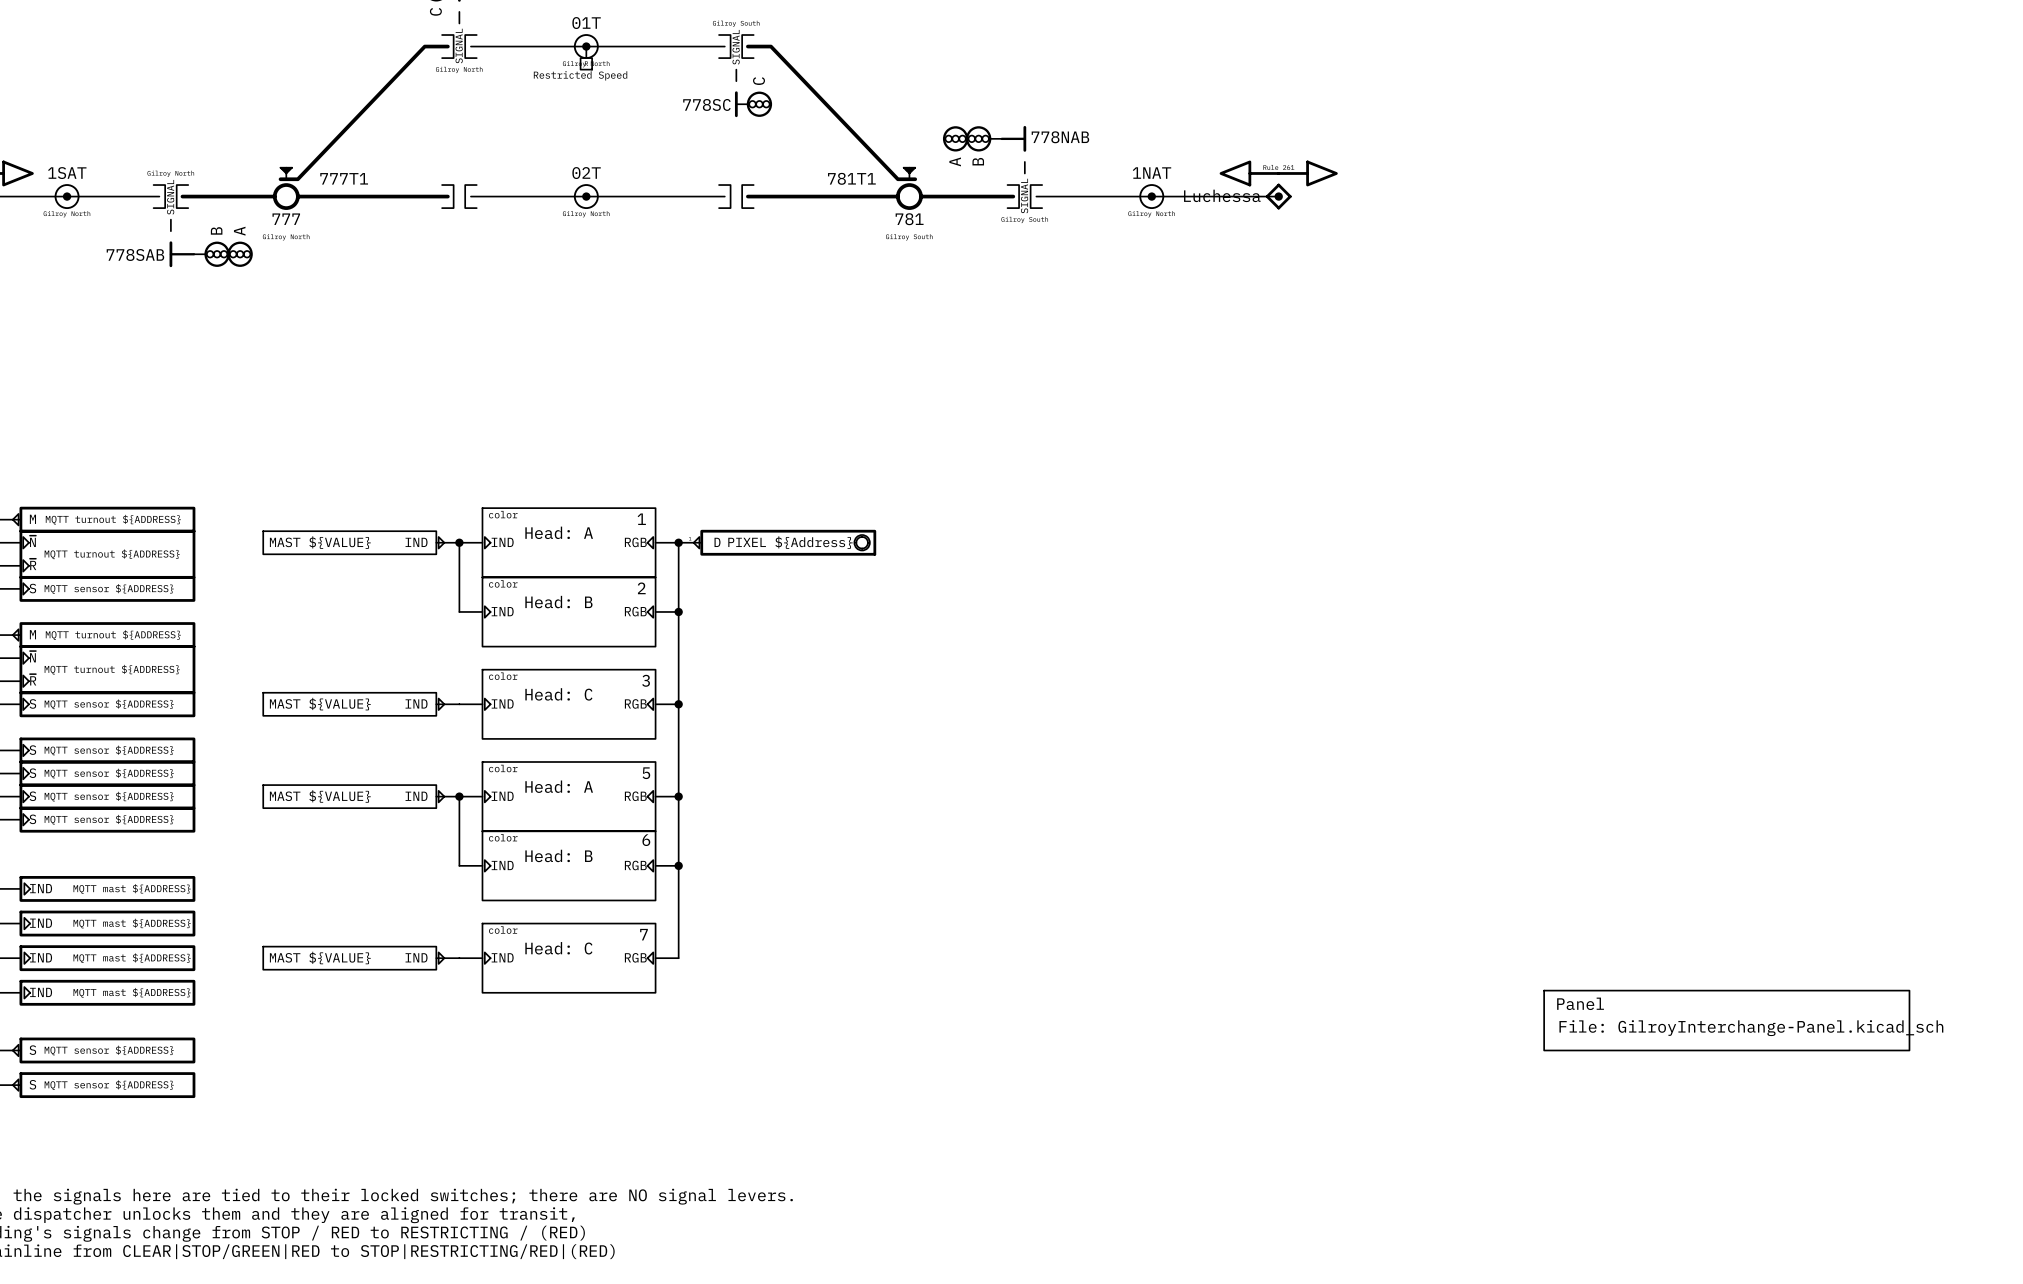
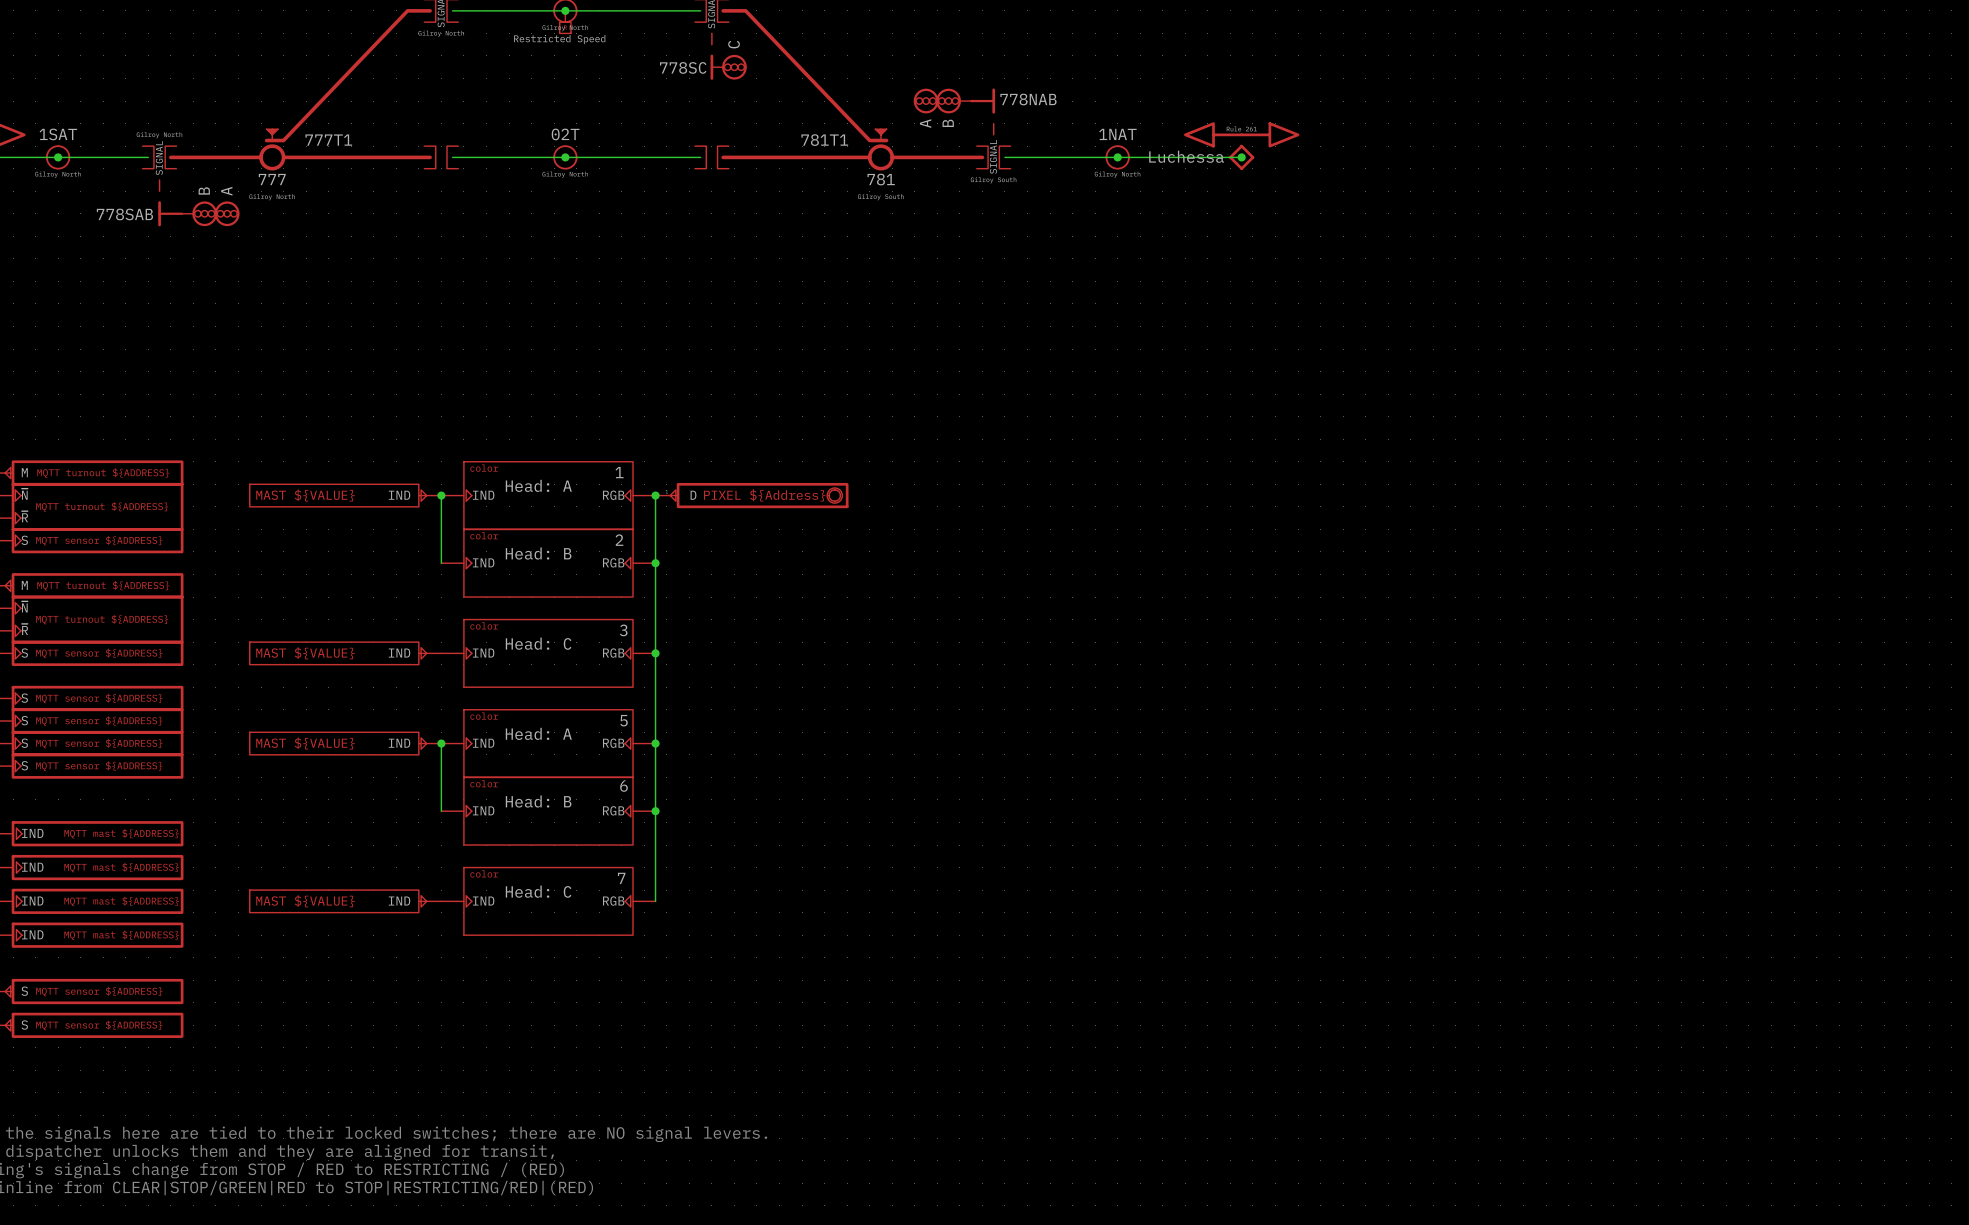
sheet Panel: File: GilroyInterchange-Panel.kicad_sch (1726, 1020) -> none

